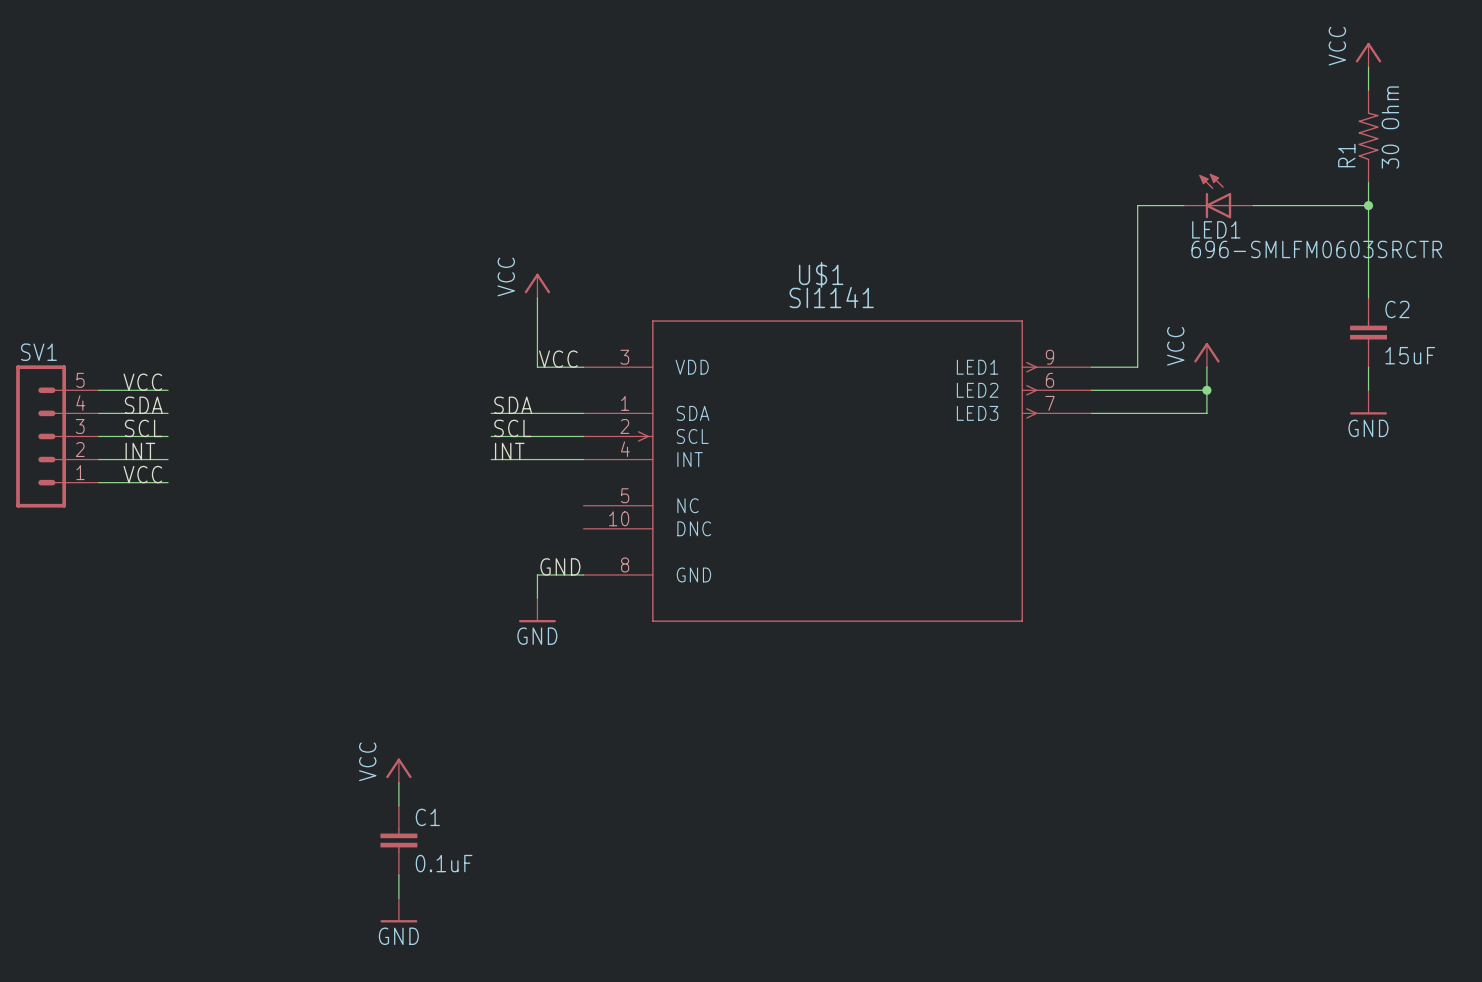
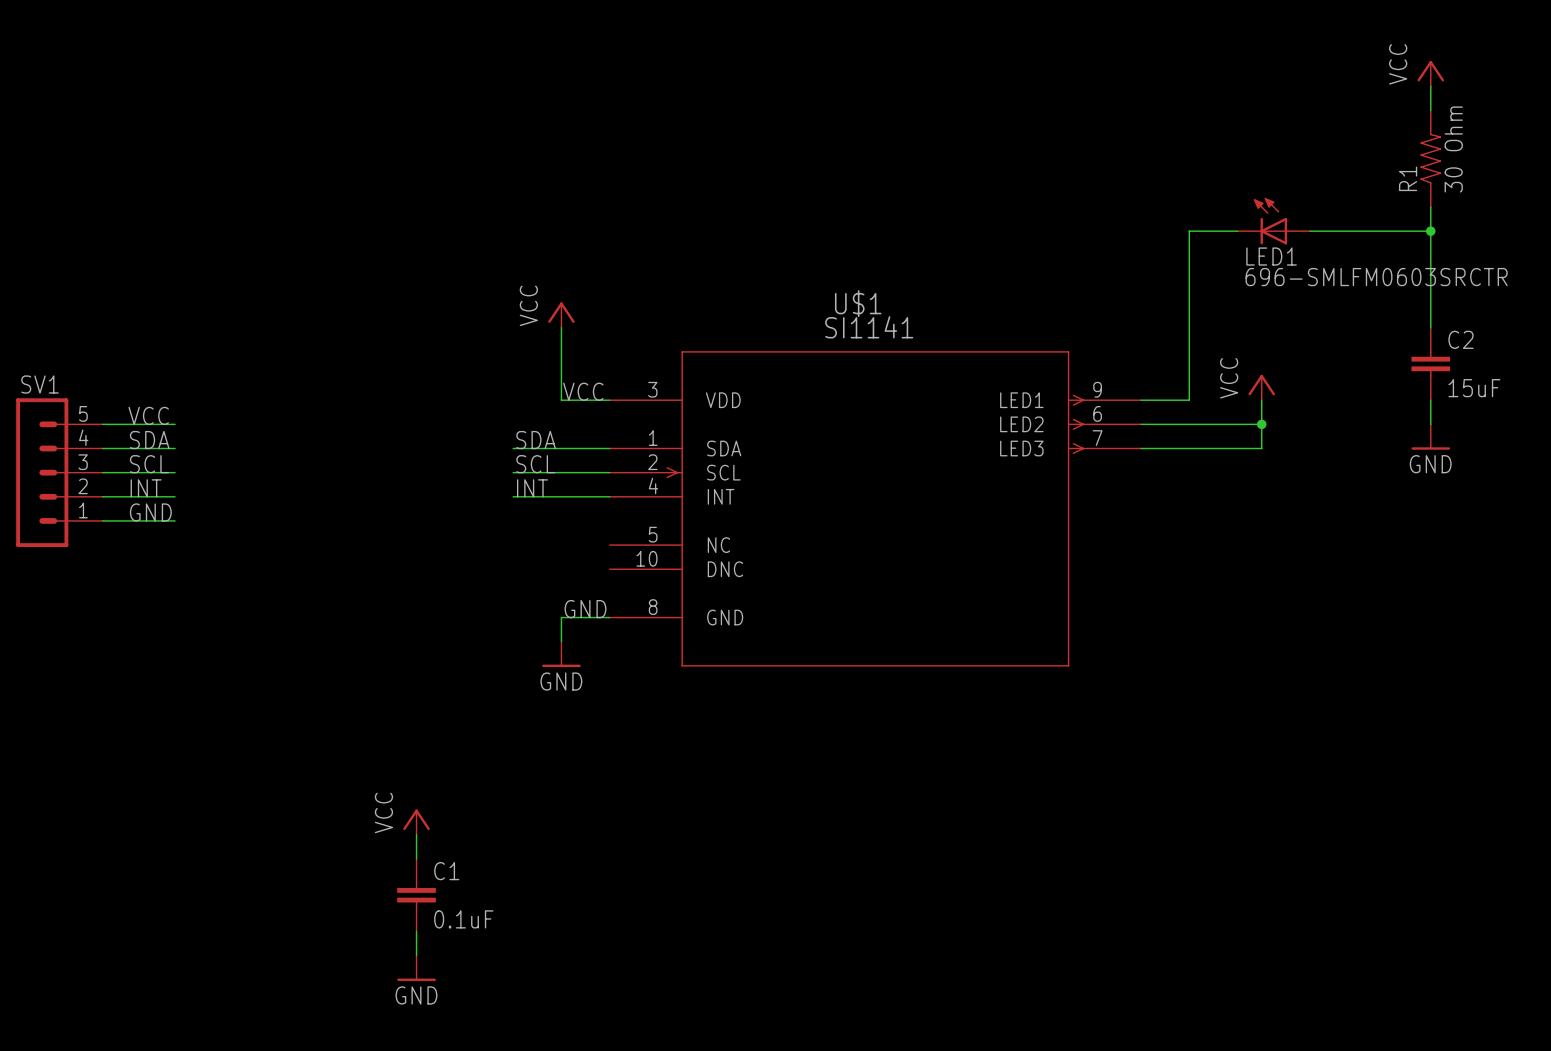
label: VCC (142, 474) -> GND (150, 512)

